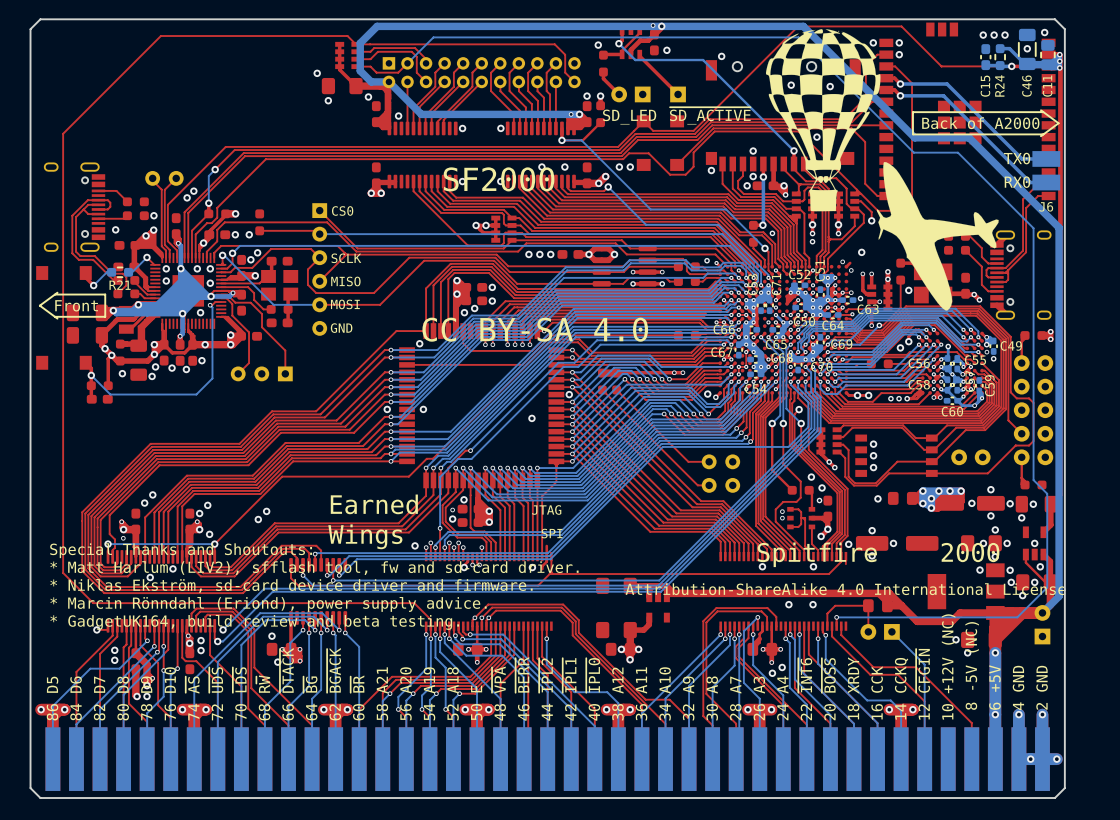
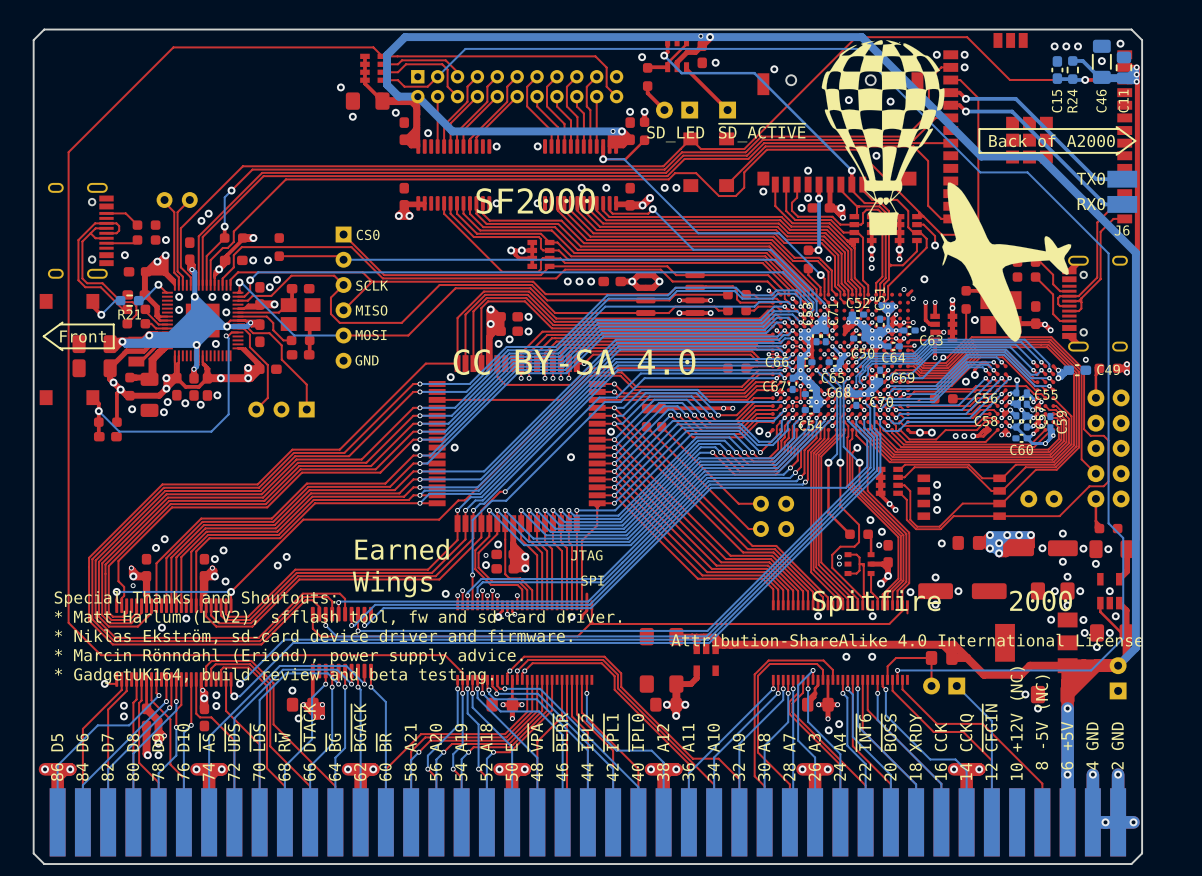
C49 footprint: [989, 337, 998, 355] -> [1063, 364, 1092, 376]
via: (986, 352) -> none
via position: (993, 358) -> (1085, 359)

